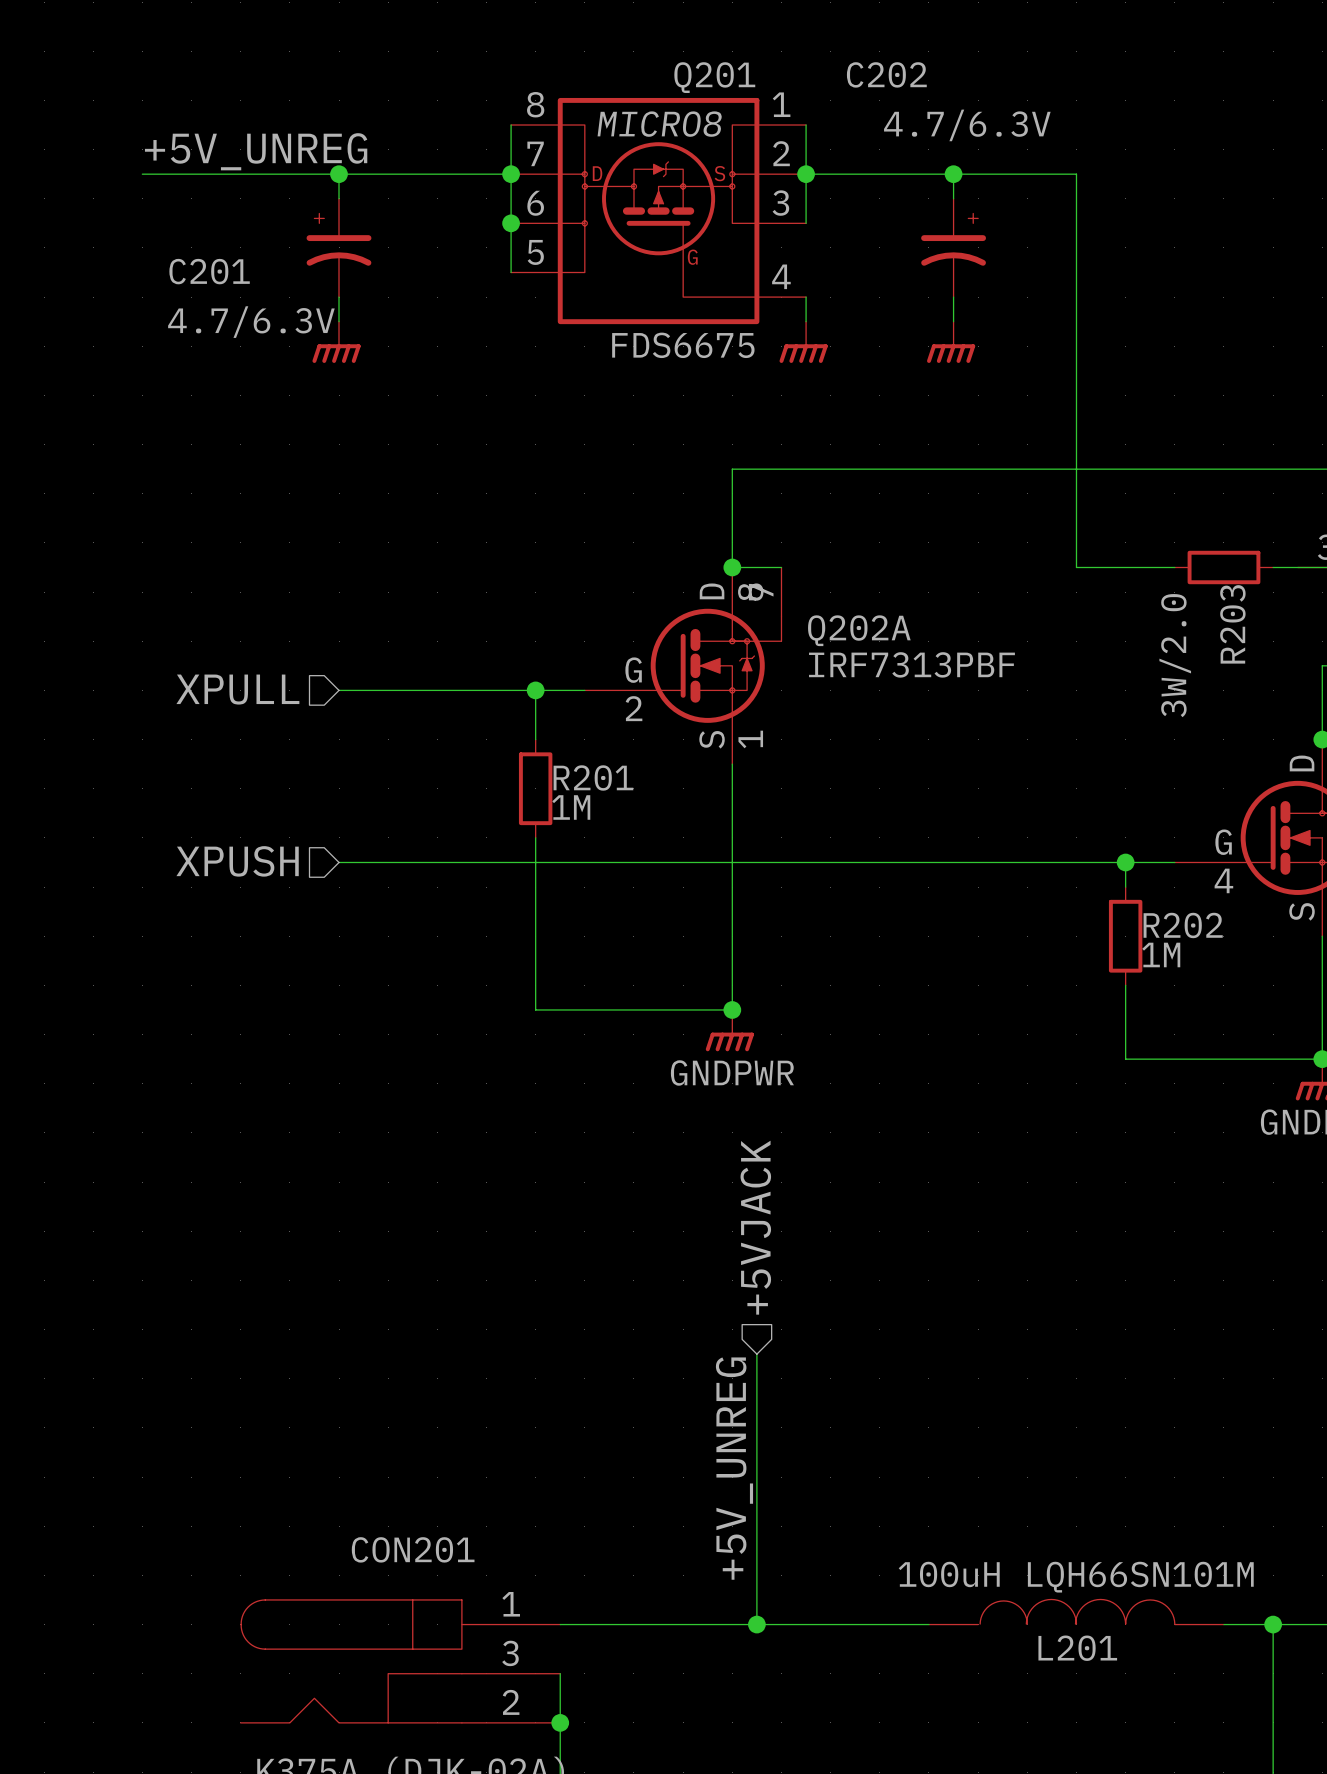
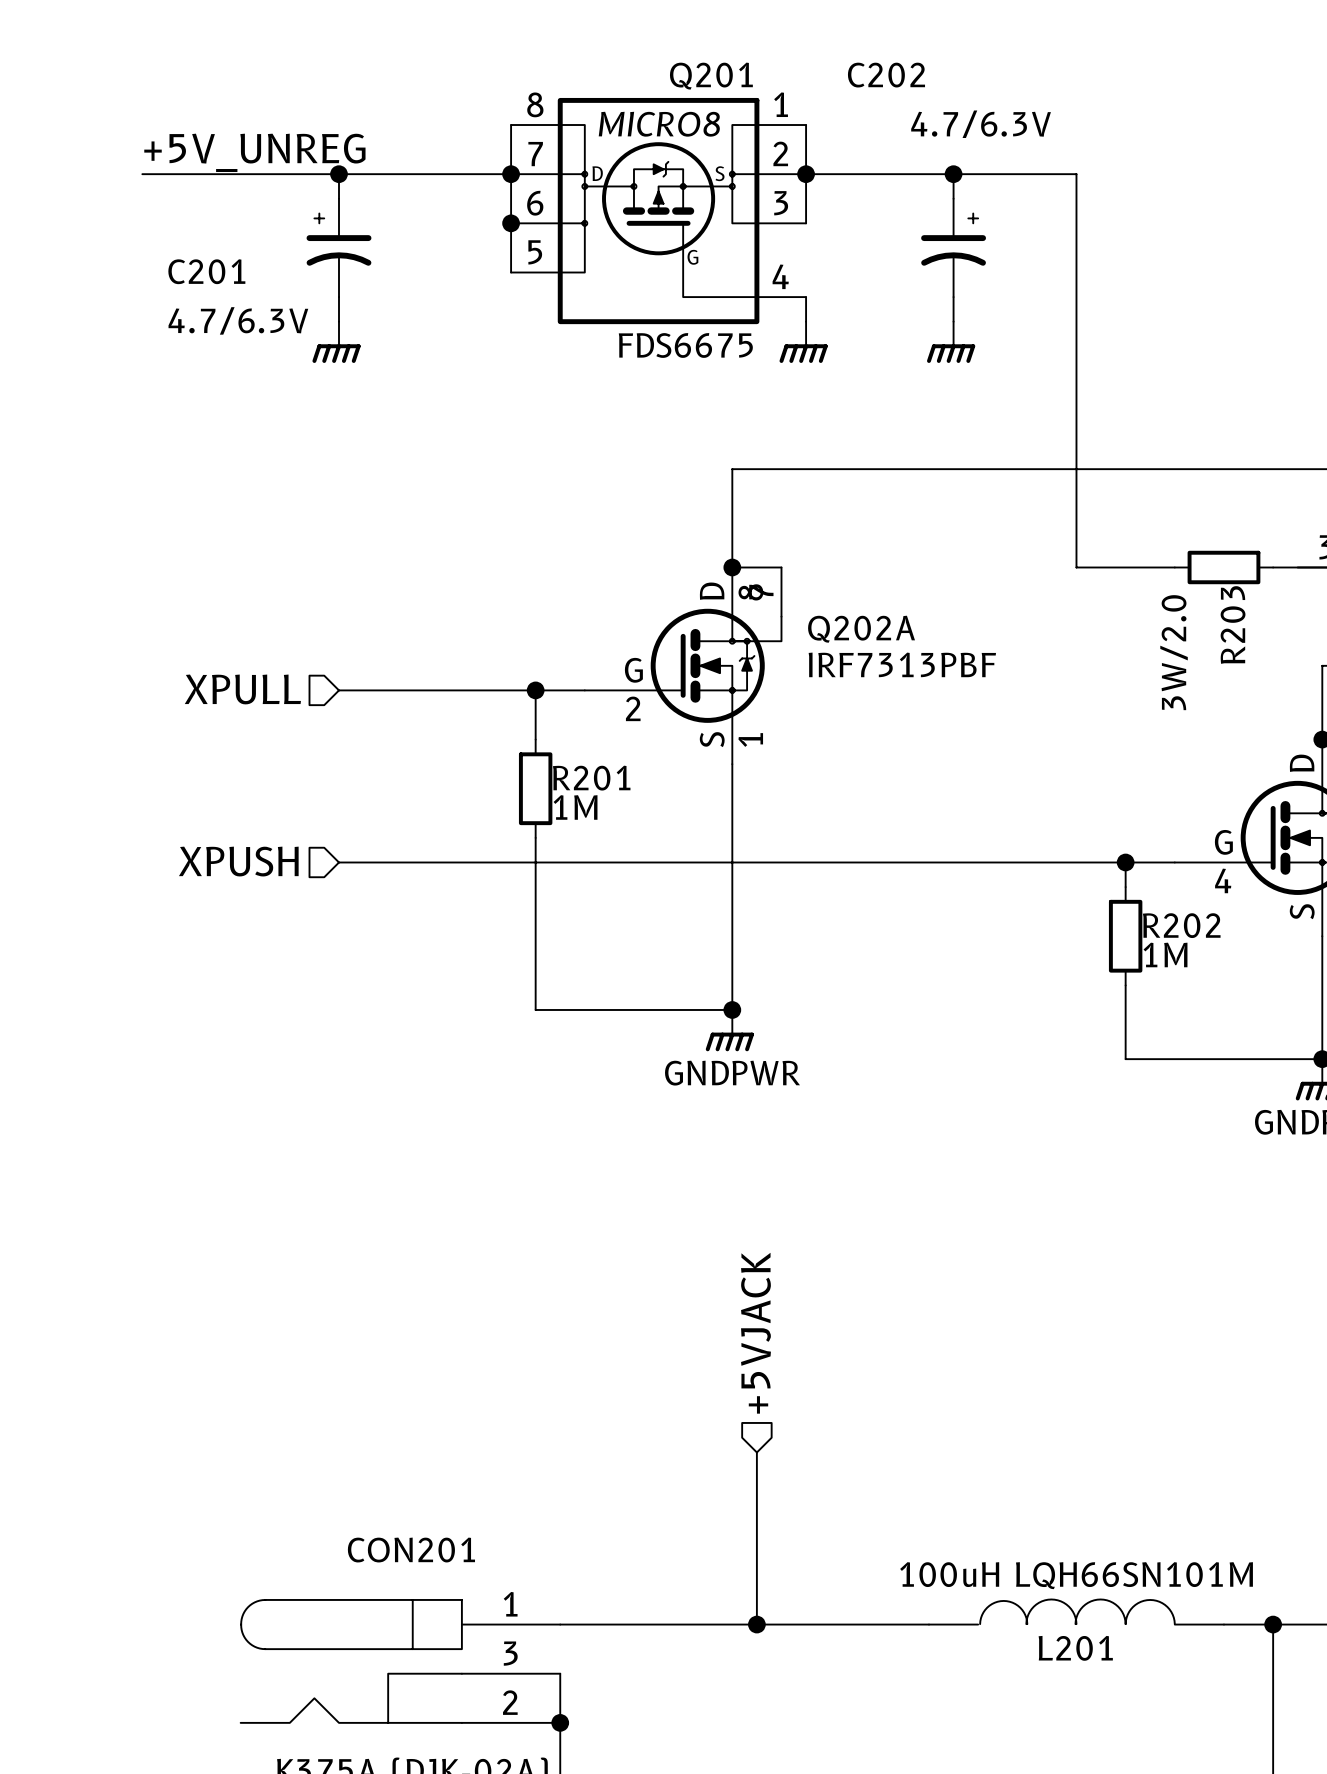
hierarchical label position: +5VJACK (755, 1227) -> +5VJACK (755, 1333)
wire: (756, 1354) (756, 1452) -> none
label: +5V_UNREG (734, 1468) -> none

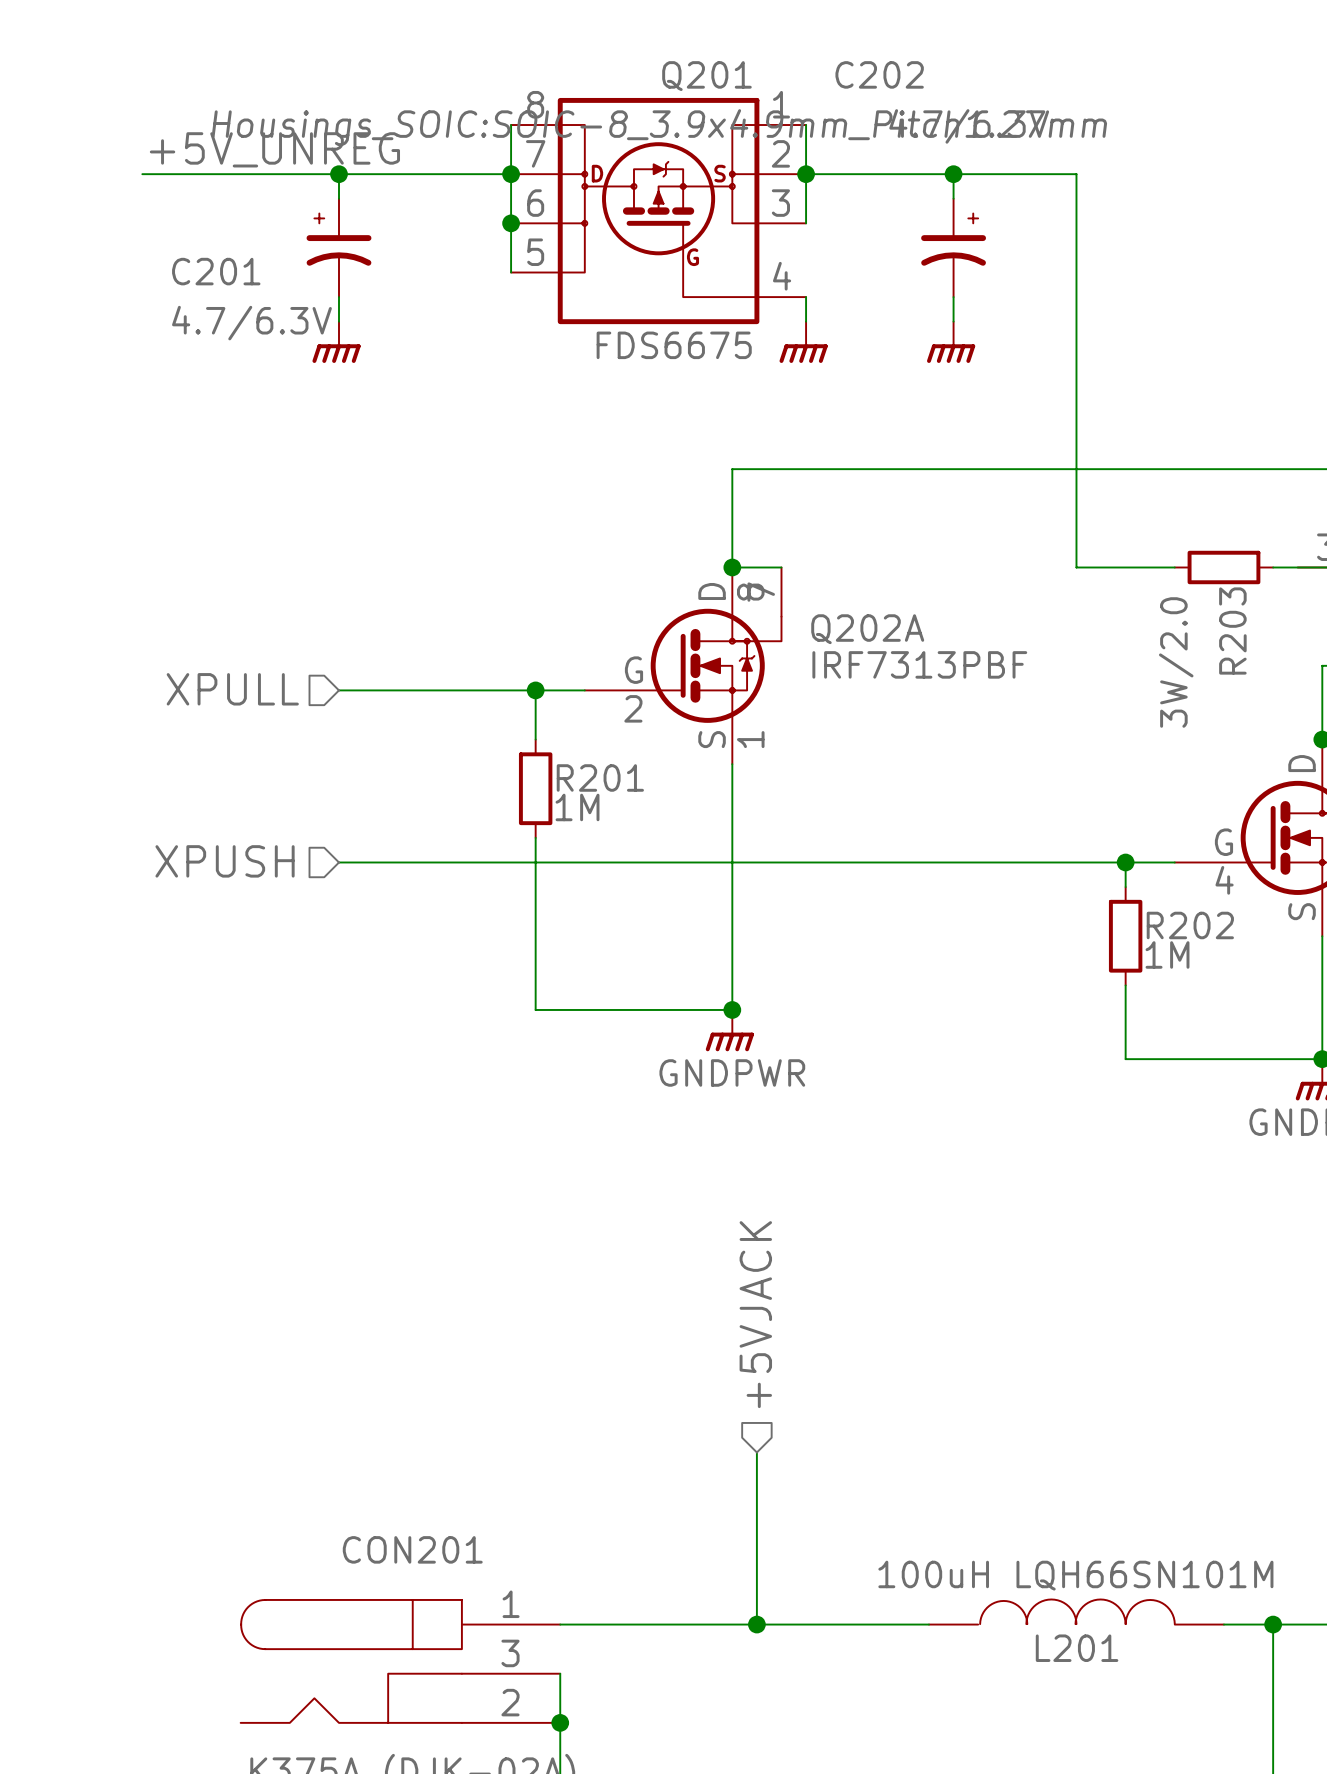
Q201 text: MICRO8 (659, 124) -> Housings_SOIC:SOIC-8_3.9x4.9mm_Pitch1.27mm (659, 127)

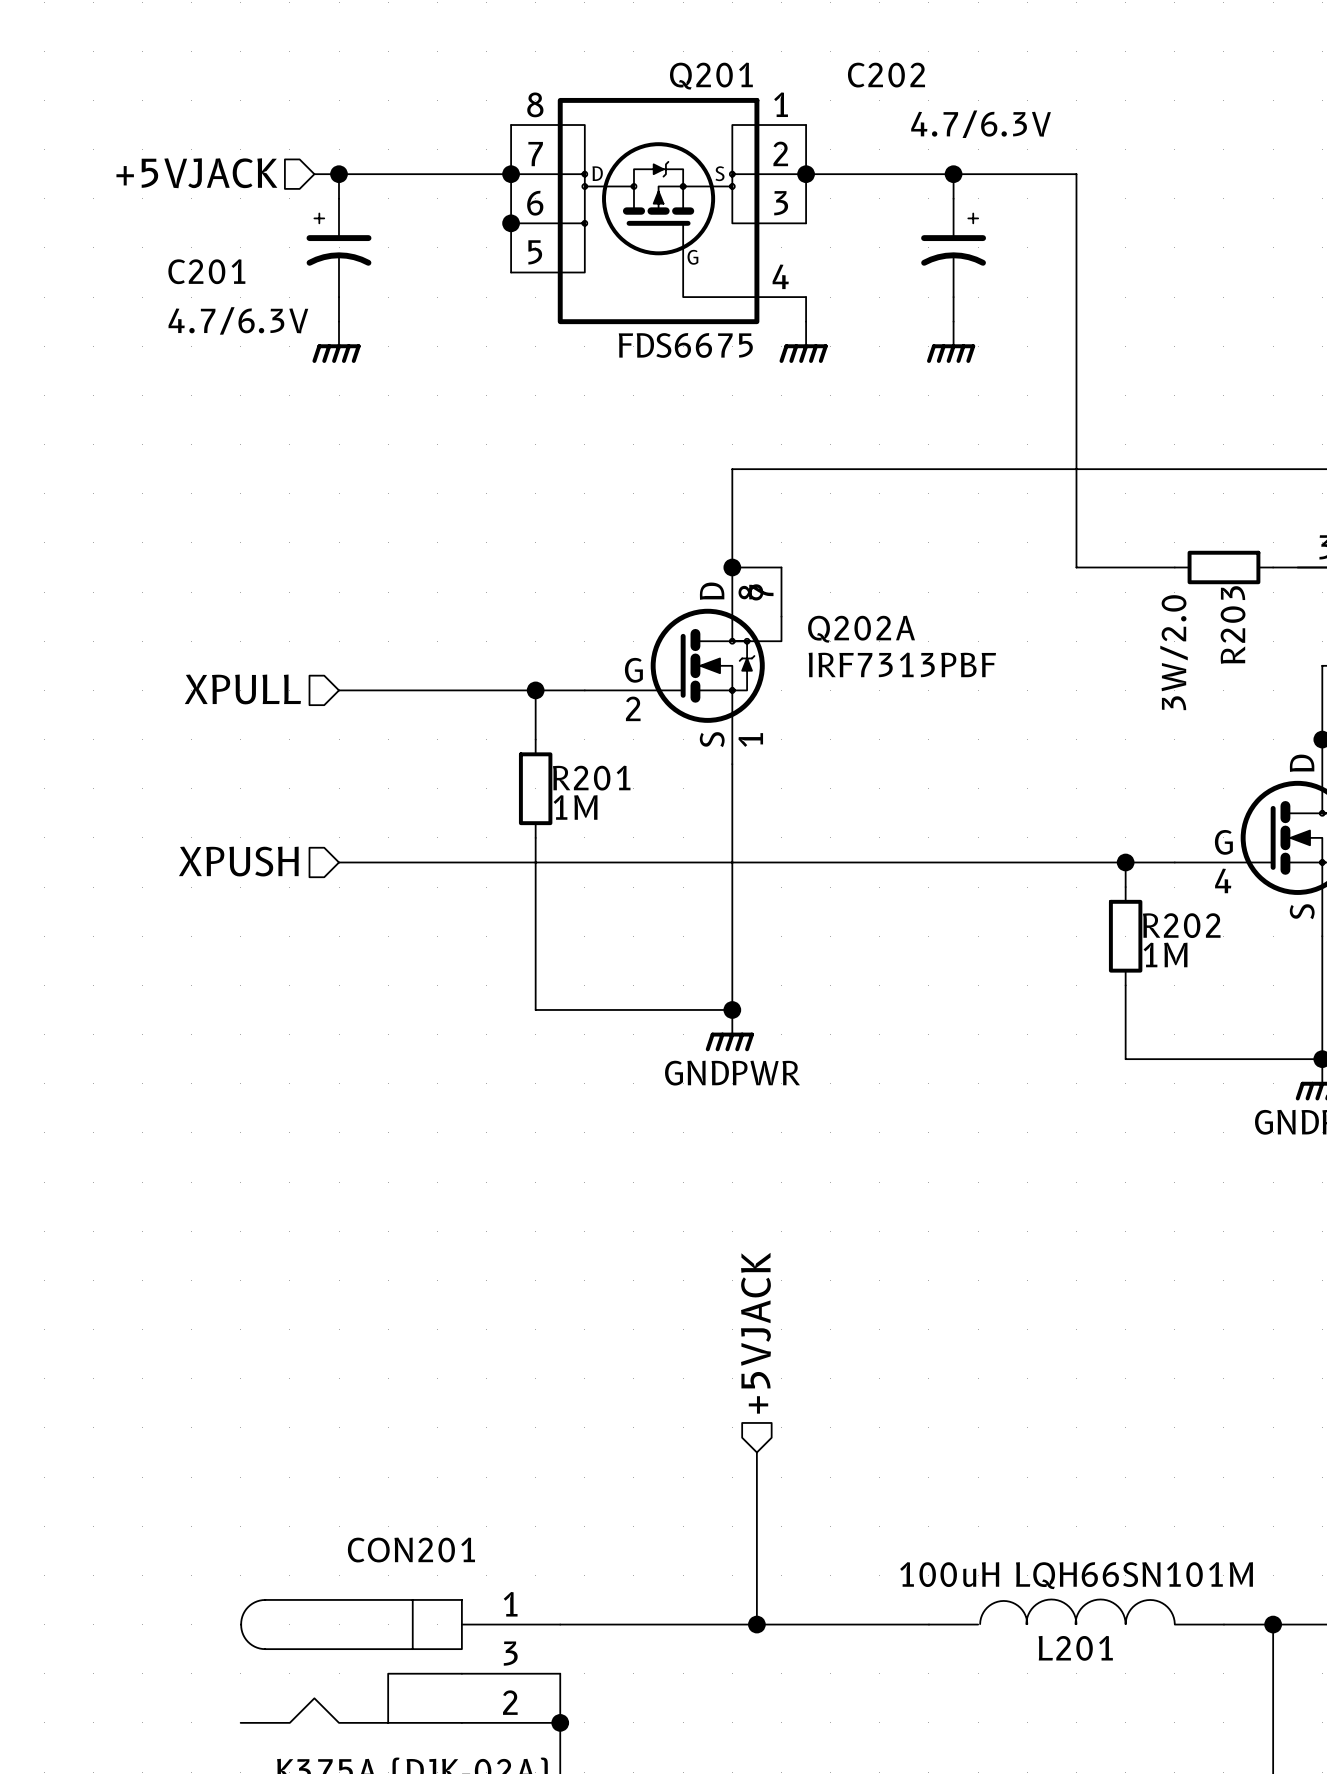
Q201 text: Housings_SOIC:SOIC-8_3.9x4.9mm_Pitch1.27mm (659, 127) -> none
label: +5V_UNREG (274, 149) -> none
hierarchical label: none -> +5VJACK (196, 173)
wire: (142, 174) (314, 174) -> none

